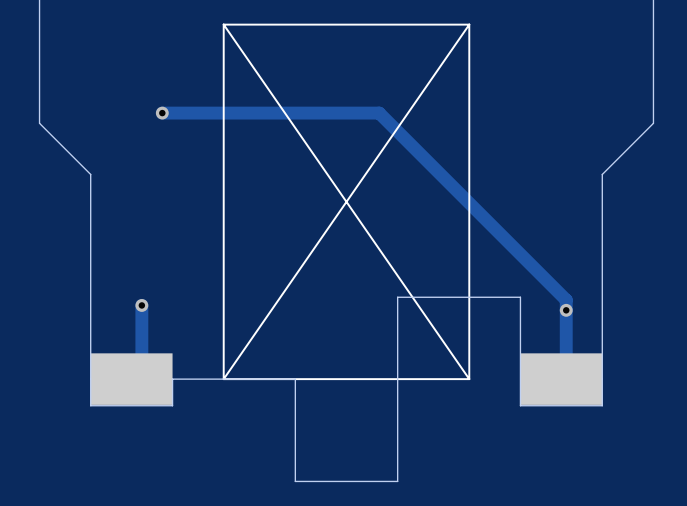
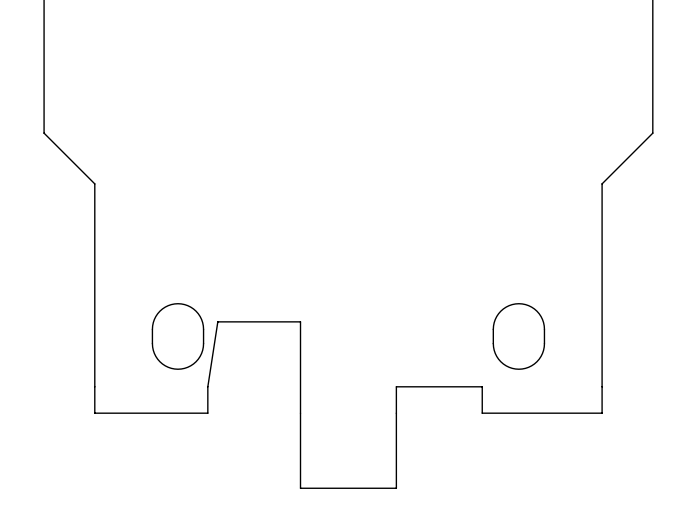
line: (223, 24) (469, 379) -> none
line: (223, 24) (223, 379) -> none
line: (469, 24) (223, 24) -> none
line: (469, 24) (223, 379) -> none
line: (469, 24) (469, 379) -> none
track: (162, 113) (379, 113) (566, 300) (566, 374) (561, 379) -> none
via: (162, 113) -> none
track: (141, 305) (141, 368) (131, 379) -> none
via: (141, 305) -> none
via: (566, 310) -> none
board edge: none -> (203, 329) (201, 353) (190, 365) (181, 369) (171, 368) (162, 363) (155, 356) (152, 347) (152, 325) (155, 316) (165, 307) (177, 303) (190, 307) (200, 316) (203, 329)
board edge: none -> (544, 329) (542, 353) (531, 365) (522, 369) (512, 368) (503, 363) (496, 356) (493, 347) (493, 325) (496, 316) (506, 307) (518, 303) (531, 307) (541, 316) (544, 329)
part: (131, 379) -> none
line: (469, 379) (223, 379) -> none
part: (561, 379) -> none
board edge: (172, 405) (172, 379) (295, 379) (295, 481) (298, 481) -> (175, 413) (207, 413) (207, 386) (217, 321) (300, 321) (300, 488)
board edge: (520, 405) (520, 297) (397, 297) (397, 481) (394, 481) -> (520, 413) (482, 413) (482, 386) (396, 386) (396, 488)

